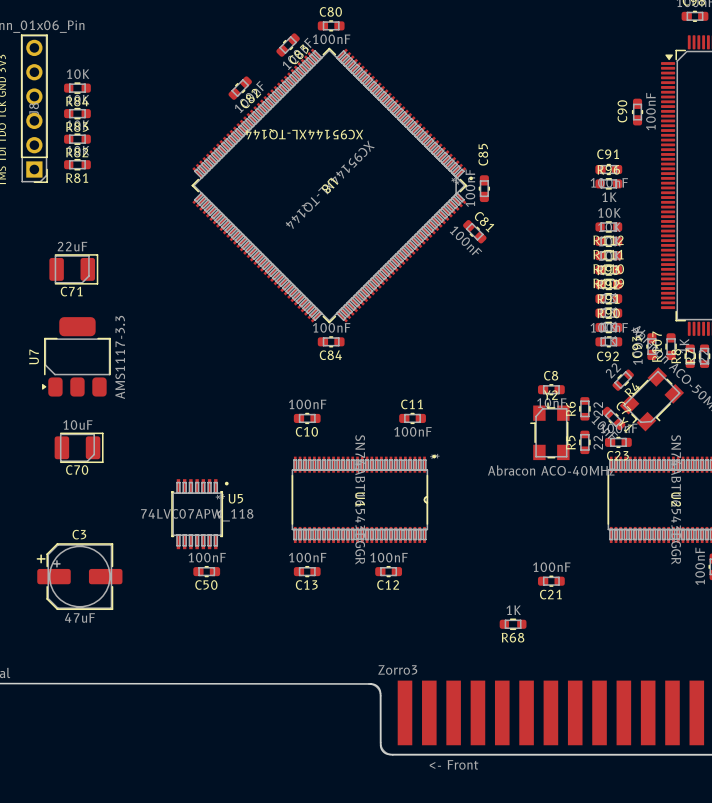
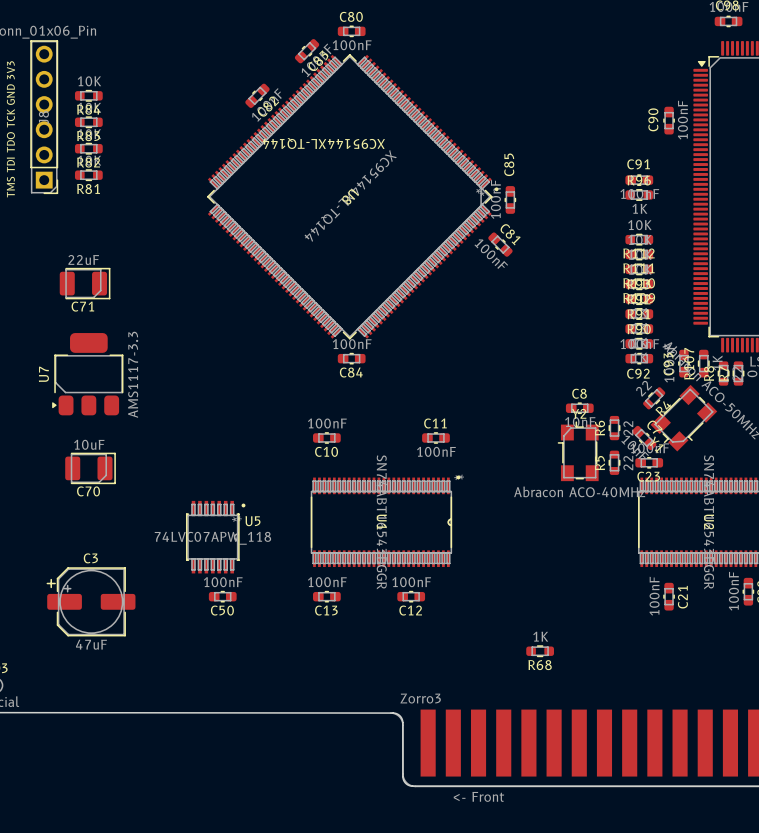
C21 value position: 100nF (551, 567) -> 100nF (654, 596)
C21 rotation: 0° (551, 581) -> 90° clockwise (669, 596)
C21 position: (551, 581) -> (669, 596)
C21 name position: C21 (550, 594) -> C21 (682, 597)

